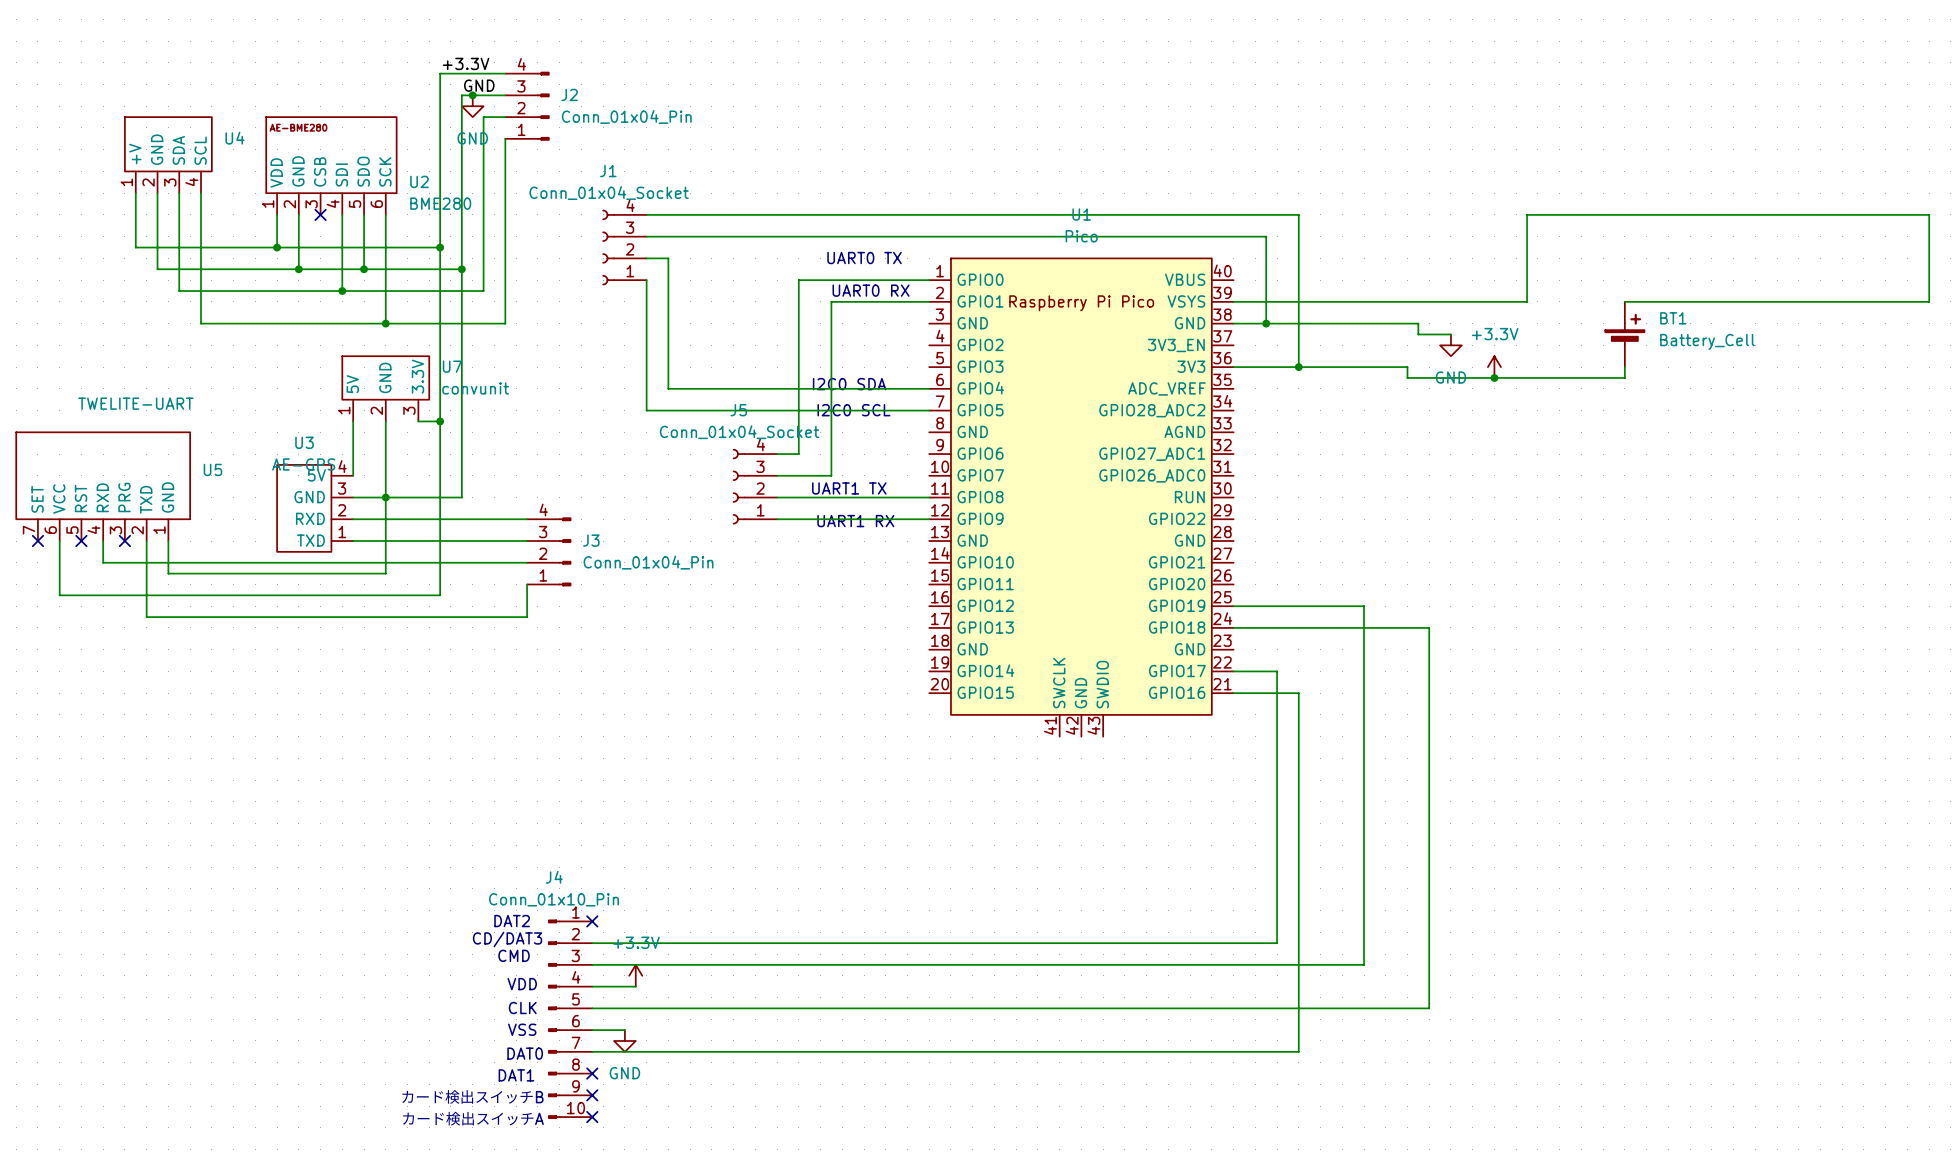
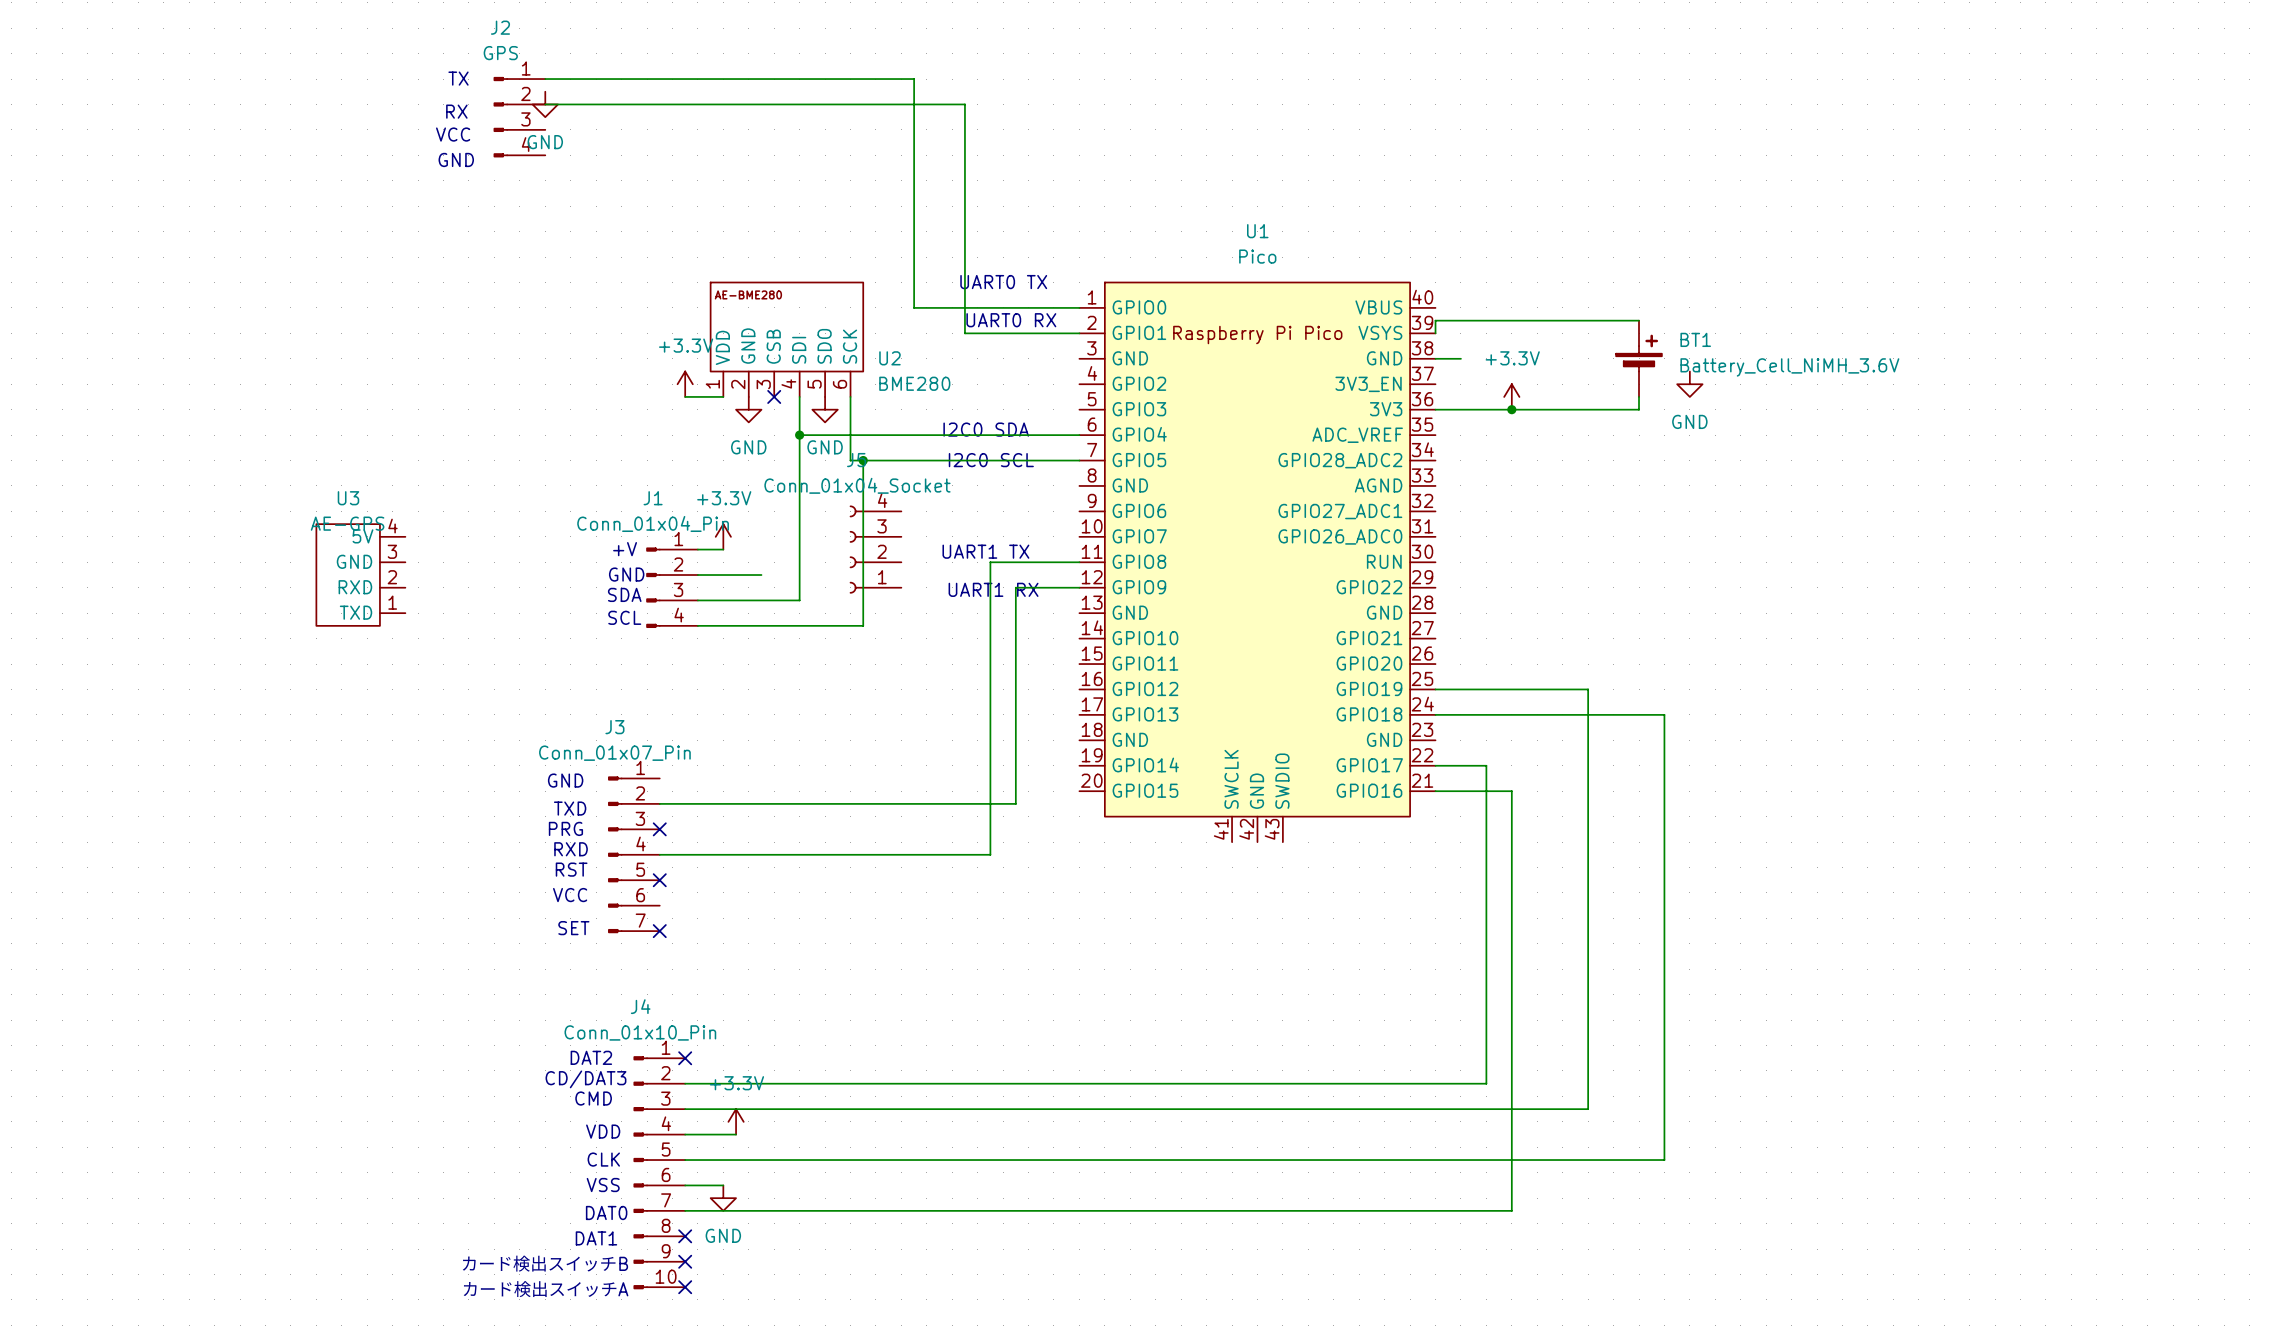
label: +3.3V (466, 63) -> none
wire: (505, 73) (440, 73) (440, 595) (59, 595) (59, 541) -> none
text: none -> TX (458, 78)
label: GND (479, 85) -> none
J2 name position: J2 (569, 94) -> J2 (500, 27)
junction: (472, 95) -> none
wire: (505, 95) (461, 95) (461, 497) (353, 497) -> none
J2 position: (527, 106) -> (519, 117)
J2 rotation: 0° (543, 106) -> 180° (500, 117)
text: none -> RX (456, 111)
J2 value: Conn_01x04_Pin (626, 116) -> GPS (500, 53)
wire: (505, 117) (483, 117) (483, 291) (179, 291) (179, 193) -> none
text: none -> VCC (453, 134)
wire: (505, 138) (505, 323) (201, 323) (201, 193) -> none
text: none -> GND (456, 159)
U4: (168, 155) -> none
wire: (135, 193) (135, 247) (440, 247) -> none
wire: (157, 193) (157, 269) (461, 269) -> none
U2 position: (277, 193) -> (723, 371)
J1 value: Conn_01x04_Socket (609, 193) -> Conn_01x04_Pin (653, 523)
J1 symbol: [602, 209, 647, 286] -> [646, 547, 698, 628]
wire: (277, 214) (277, 247) -> none
wire: (298, 214) (298, 269) -> none
no-connect mark: (320, 214) -> none
wire: (342, 214) (342, 291) -> none
wire: (364, 214) (364, 269) -> none
wire: (385, 214) (385, 323) -> none
wire: (646, 214) (1298, 214) (1298, 367) -> none
wire: (646, 236) (1266, 236) (1266, 323) -> none
junction: (277, 247) -> none
junction: (440, 247) -> none
wire: (646, 258) (668, 258) (668, 388) (690, 388) -> none
junction: (298, 269) -> none
junction: (364, 269) -> none
junction: (461, 269) -> none
wire: (646, 280) (646, 410) (733, 410) -> (850, 396) (850, 460)
wire: (798, 280) (798, 454) (777, 454) -> (926, 307) (914, 307) (914, 79) (545, 79)
junction: (342, 291) -> none
wire: (831, 301) (831, 475) (777, 475) -> (964, 333) (964, 104) (545, 104)
wire: (1233, 301) (1527, 301) (1527, 214) (1929, 214) (1929, 301) (1624, 301) -> (1435, 333) (1435, 320) (1639, 320)
junction: (385, 323) -> none
wire: (1255, 323) (1418, 323) (1418, 334) (1450, 334) -> none
junction: (1266, 323) -> none
BT1 position: (1624, 334) -> (1639, 358)
BT1 value: Battery_Cell (1707, 341) -> Battery_Cell_NiMH_3.6V (1789, 367)
power symbol: none -> +3.3V (685, 384)
wire: none -> (685, 396) (723, 396)
no-connect mark: none -> (774, 396)
wire: none -> (799, 396) (799, 600) (697, 600)
power symbol: none -> GND (748, 409)
power symbol: none -> GND (825, 409)
wire: (1407, 367) (1407, 377) (1624, 377) (1624, 367) -> (1639, 409) (1639, 396)
power symbol position: +3.3V (1494, 367) -> +3.3V (1511, 396)
junction: (1494, 377) -> none
U7: convunit (385, 388) -> none
junction: none -> (799, 435)
wire: none -> (863, 460) (863, 625) (697, 625)
junction: none -> (863, 460)
wire: (353, 421) (353, 475) -> none
wire: (385, 421) (385, 573) (168, 573) (168, 541) -> none
wire: (418, 421) (440, 421) -> (697, 549) (723, 549)
junction: (440, 421) -> none
power symbol: none -> +3.3V (723, 536)
U5: TWELITE-UART (103, 486) -> none
text: none -> +V (625, 549)
junction: (385, 497) -> none
wire: (777, 497) (853, 497) -> (659, 854) (990, 854) (990, 562)
text: none -> GND (626, 574)
wire: none -> (697, 575) (761, 575)
J3 symbol: [527, 517, 572, 587] -> [608, 776, 660, 934]
wire: (353, 519) (527, 519) -> none
wire: (777, 519) (874, 519) -> (659, 803) (1015, 803) (1015, 587)
text: none -> SDA (624, 594)
J3 name position: J3 (591, 540) -> J3 (614, 727)
no-connect mark: (37, 541) -> none
no-connect mark: (81, 541) -> none
wire: (103, 541) (103, 562) (527, 562) -> none
no-connect mark: (124, 541) -> none
wire: (146, 541) (146, 617) (527, 617) (527, 584) -> none
wire: (353, 541) (527, 541) -> none
text: none -> SCL (624, 617)
J3 value: Conn_01x04_Pin (648, 562) -> Conn_01x07_Pin (614, 753)
text: none -> GND (565, 780)
text: none -> TXD (570, 808)
text: none -> PRG (565, 828)
no-connect mark: none -> (659, 829)
text: none -> RXD (571, 849)
text: none -> RST (571, 869)
no-connect mark: none -> (659, 880)
text: none -> VCC (570, 895)
text: none -> SET (573, 928)
no-connect mark: none -> (659, 931)

